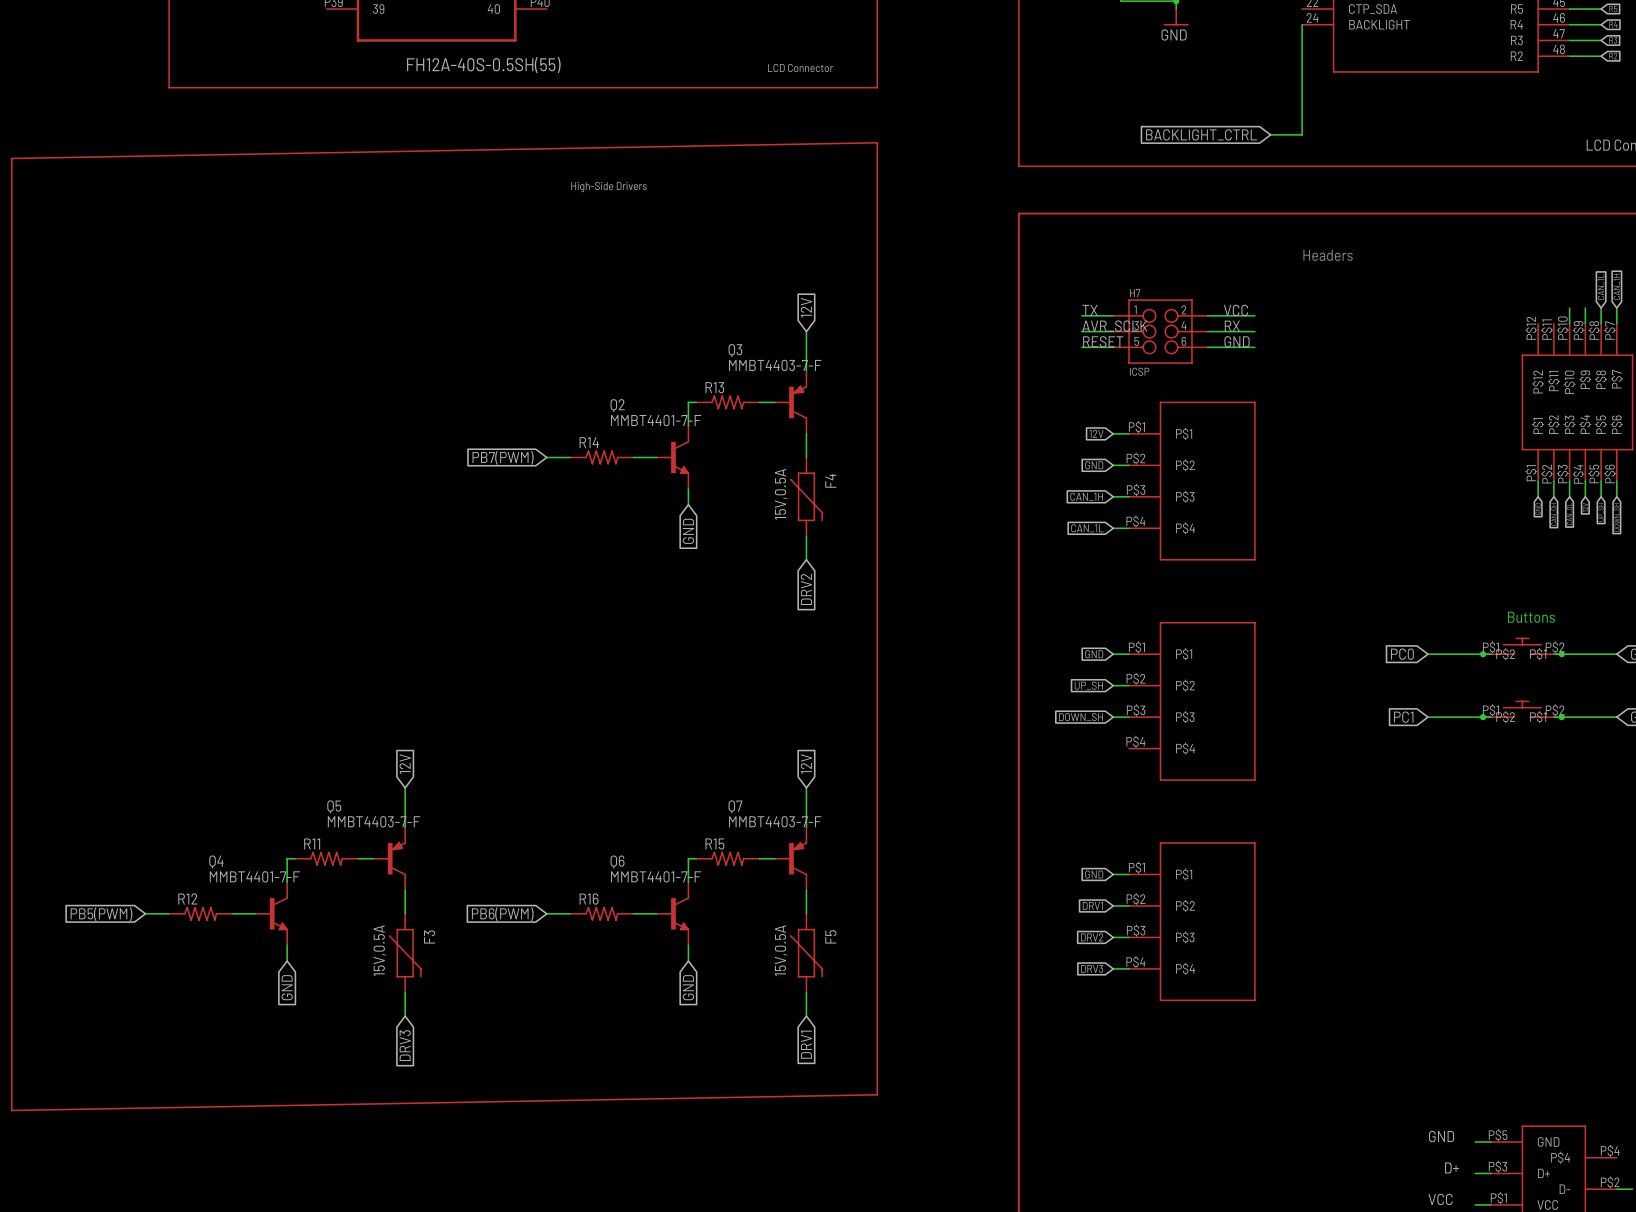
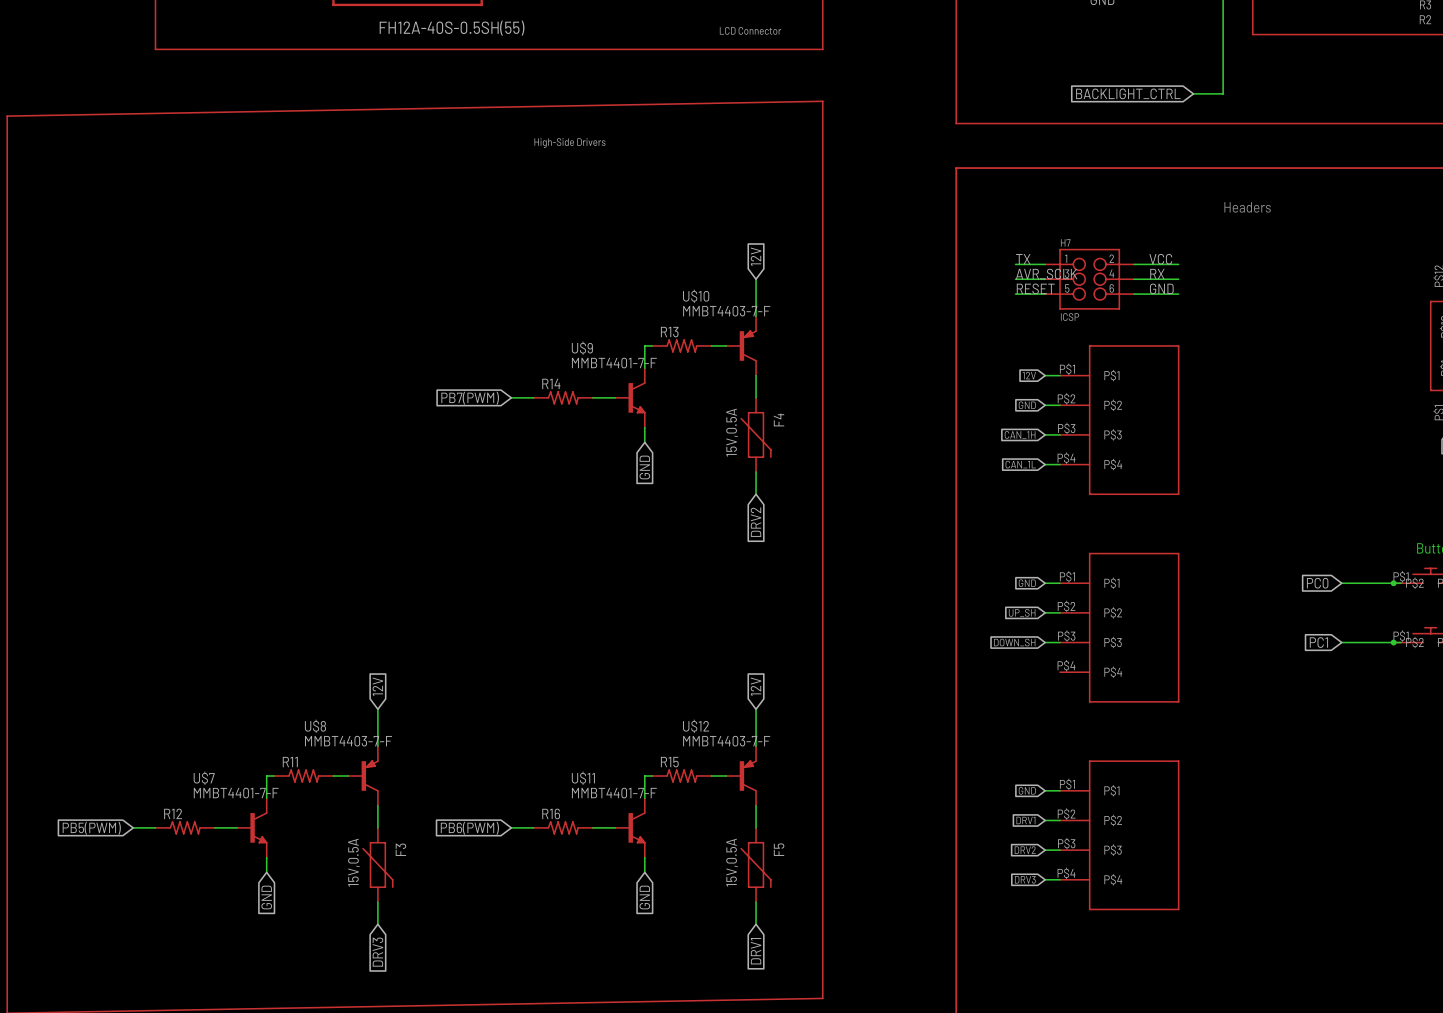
Q3 name: Q3 (735, 350) -> U$10 (696, 296)
Q2 name: Q2 (617, 405) -> U$9 (582, 348)
Q5 name: Q5 (334, 806) -> U$8 (315, 726)
Q7 name: Q7 (735, 806) -> U$12 (696, 726)
Q4 name: Q4 (216, 861) -> U$7 (204, 778)
Q6 name: Q6 (617, 861) -> U$11 (583, 778)

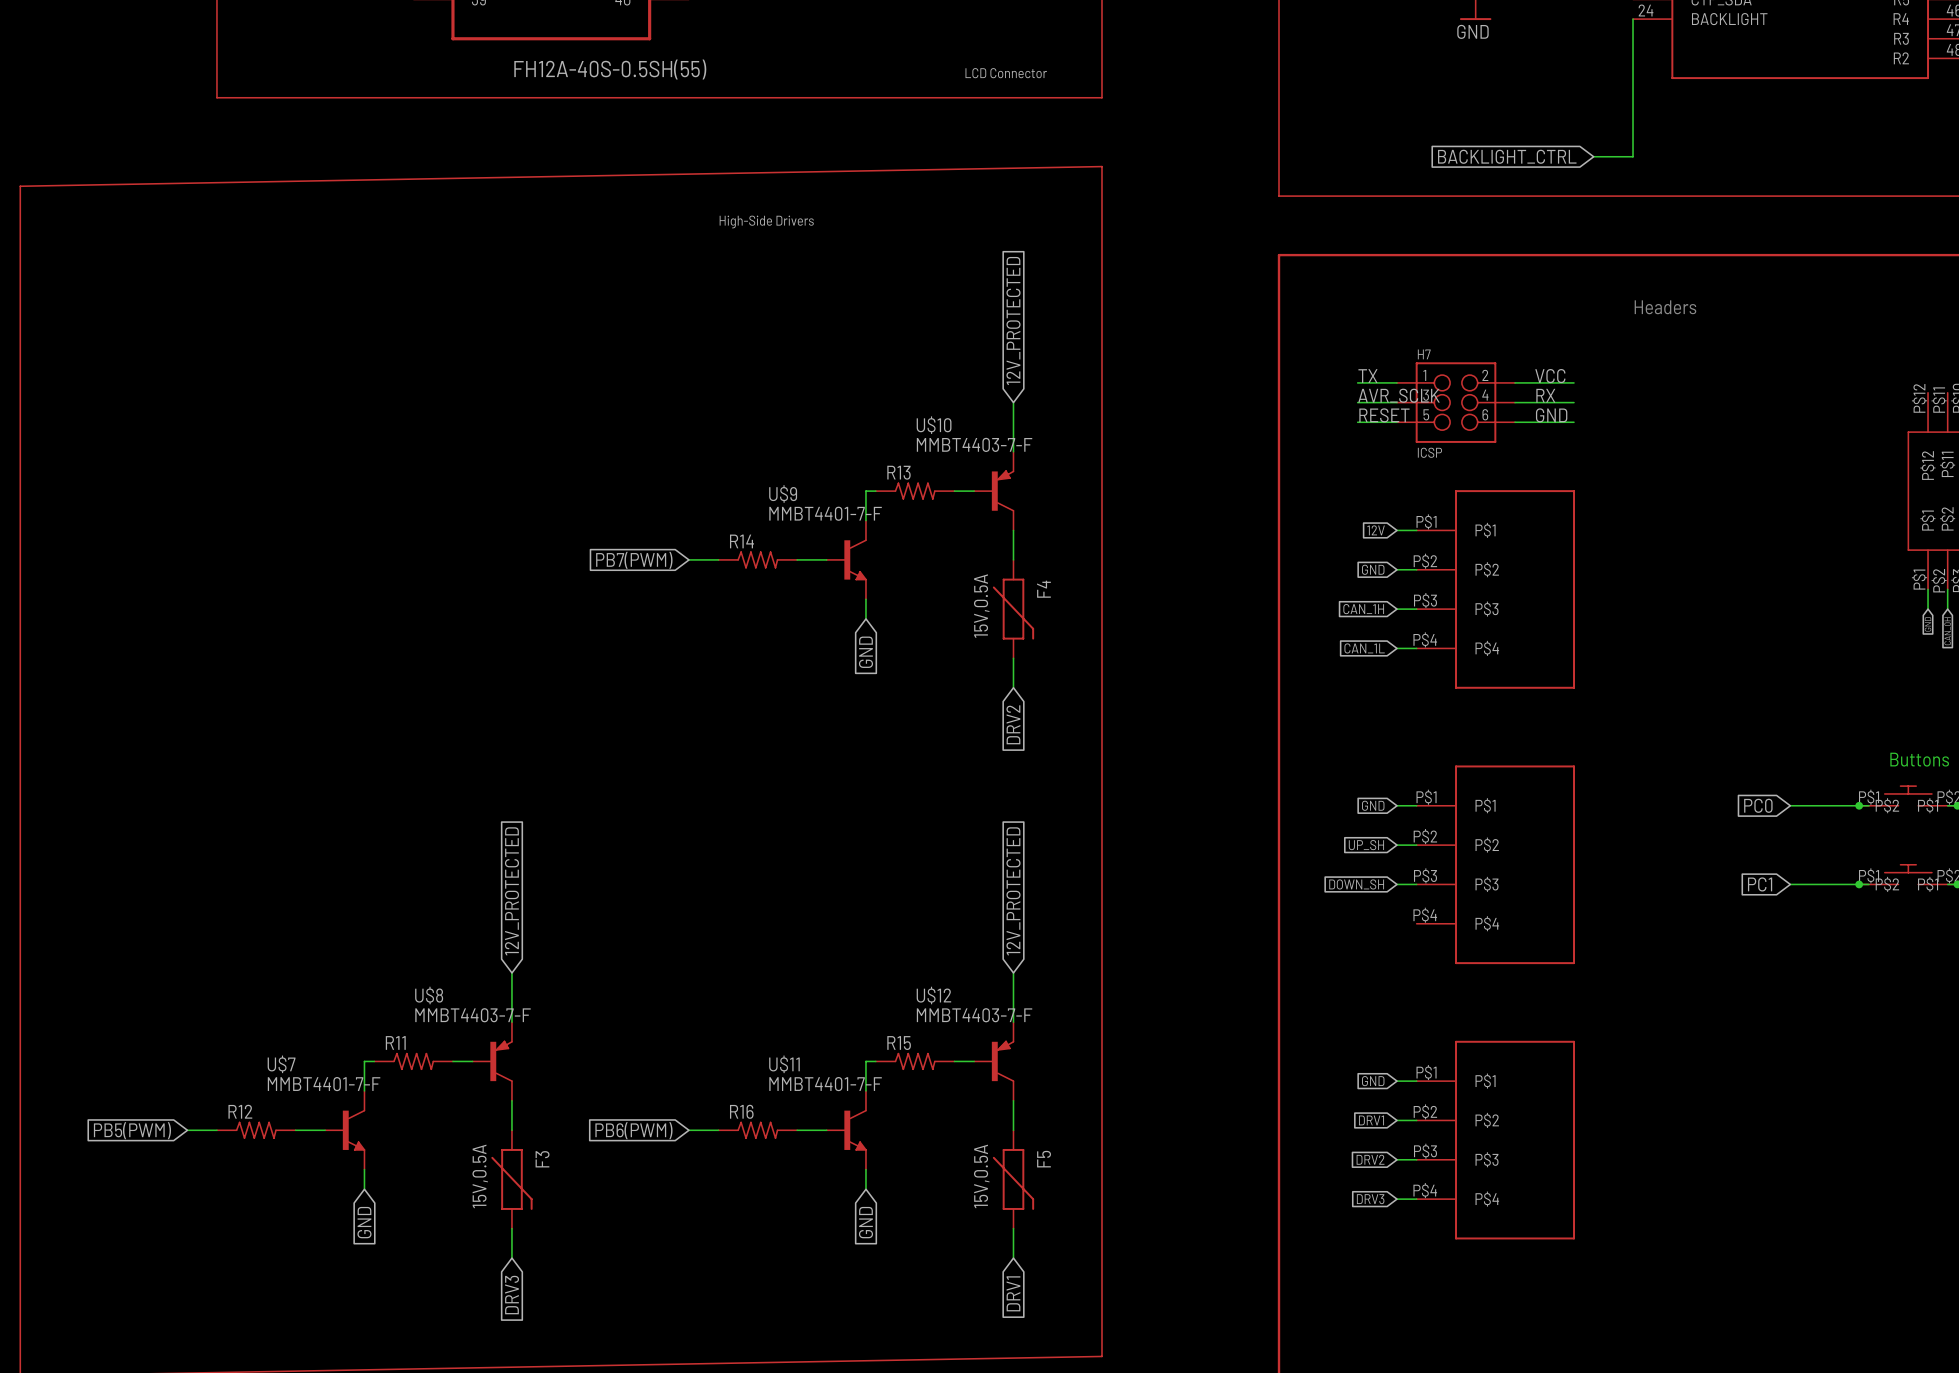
global label: 12V (755, 256) -> 12V_PROTECTED (1013, 320)
global label: 12V (377, 686) -> 12V_PROTECTED (511, 891)
global label: 12V (755, 686) -> 12V_PROTECTED (1013, 891)

